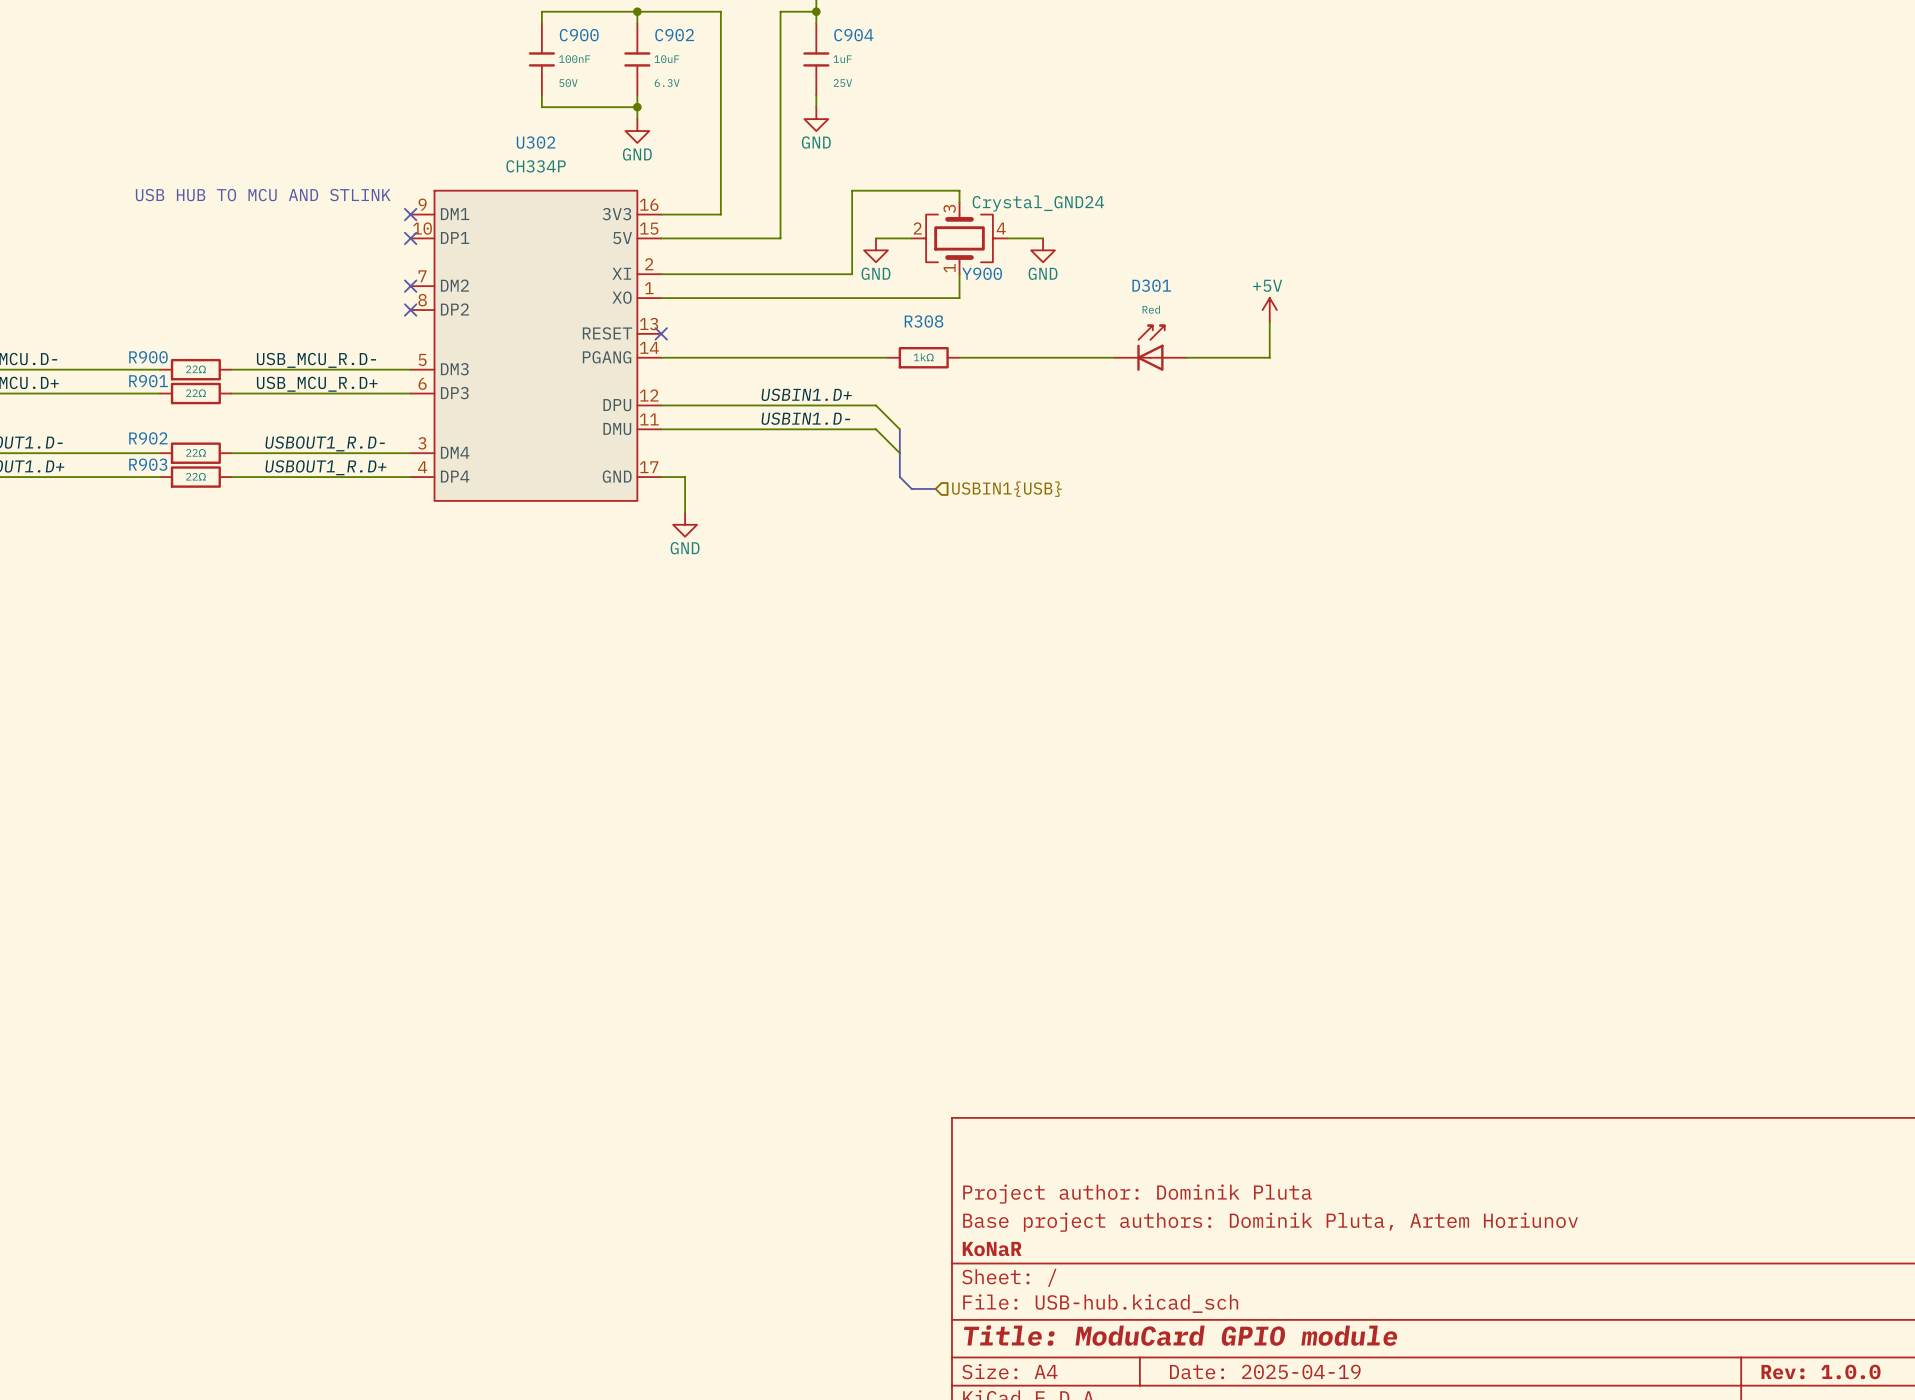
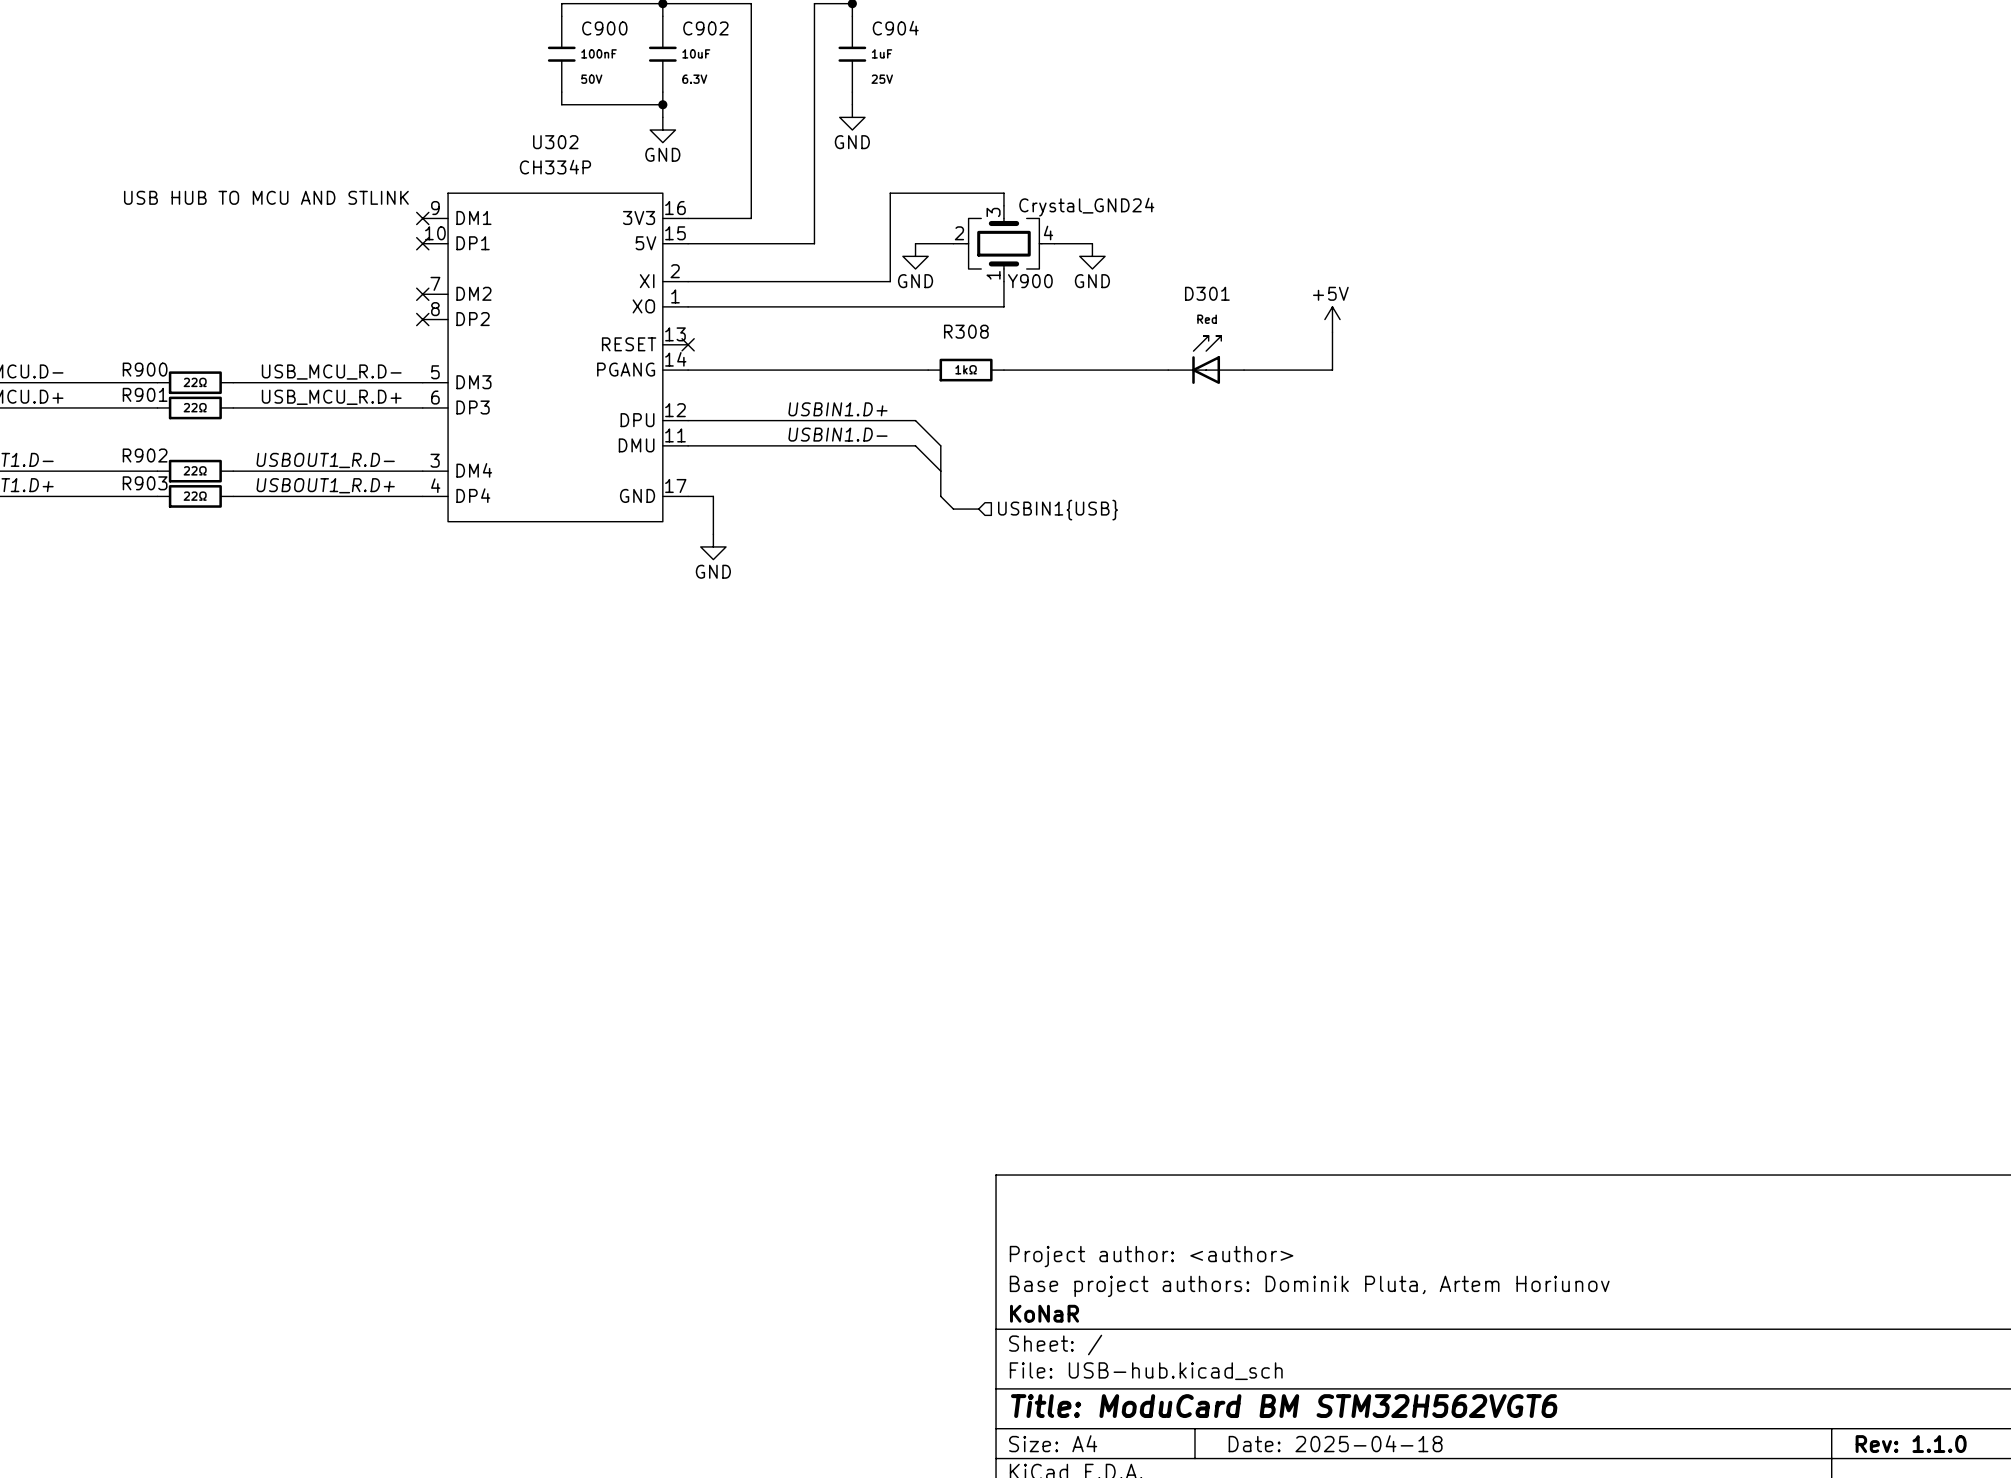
title block: Project author: Dominik Pluta (1137, 1194) -> Project author: <author> (1151, 1256)
title block: Title: ModuCard GPIO module (1180, 1335) -> Title: ModuCard BM STM32H562VGT6 (1284, 1406)
title block: Date: 2025-04-19 (1265, 1371) -> Date: 2025-04-18 (1335, 1443)
title block: Rev: 1.0.0 (1821, 1371) -> Rev: 1.1.0 (1911, 1444)

